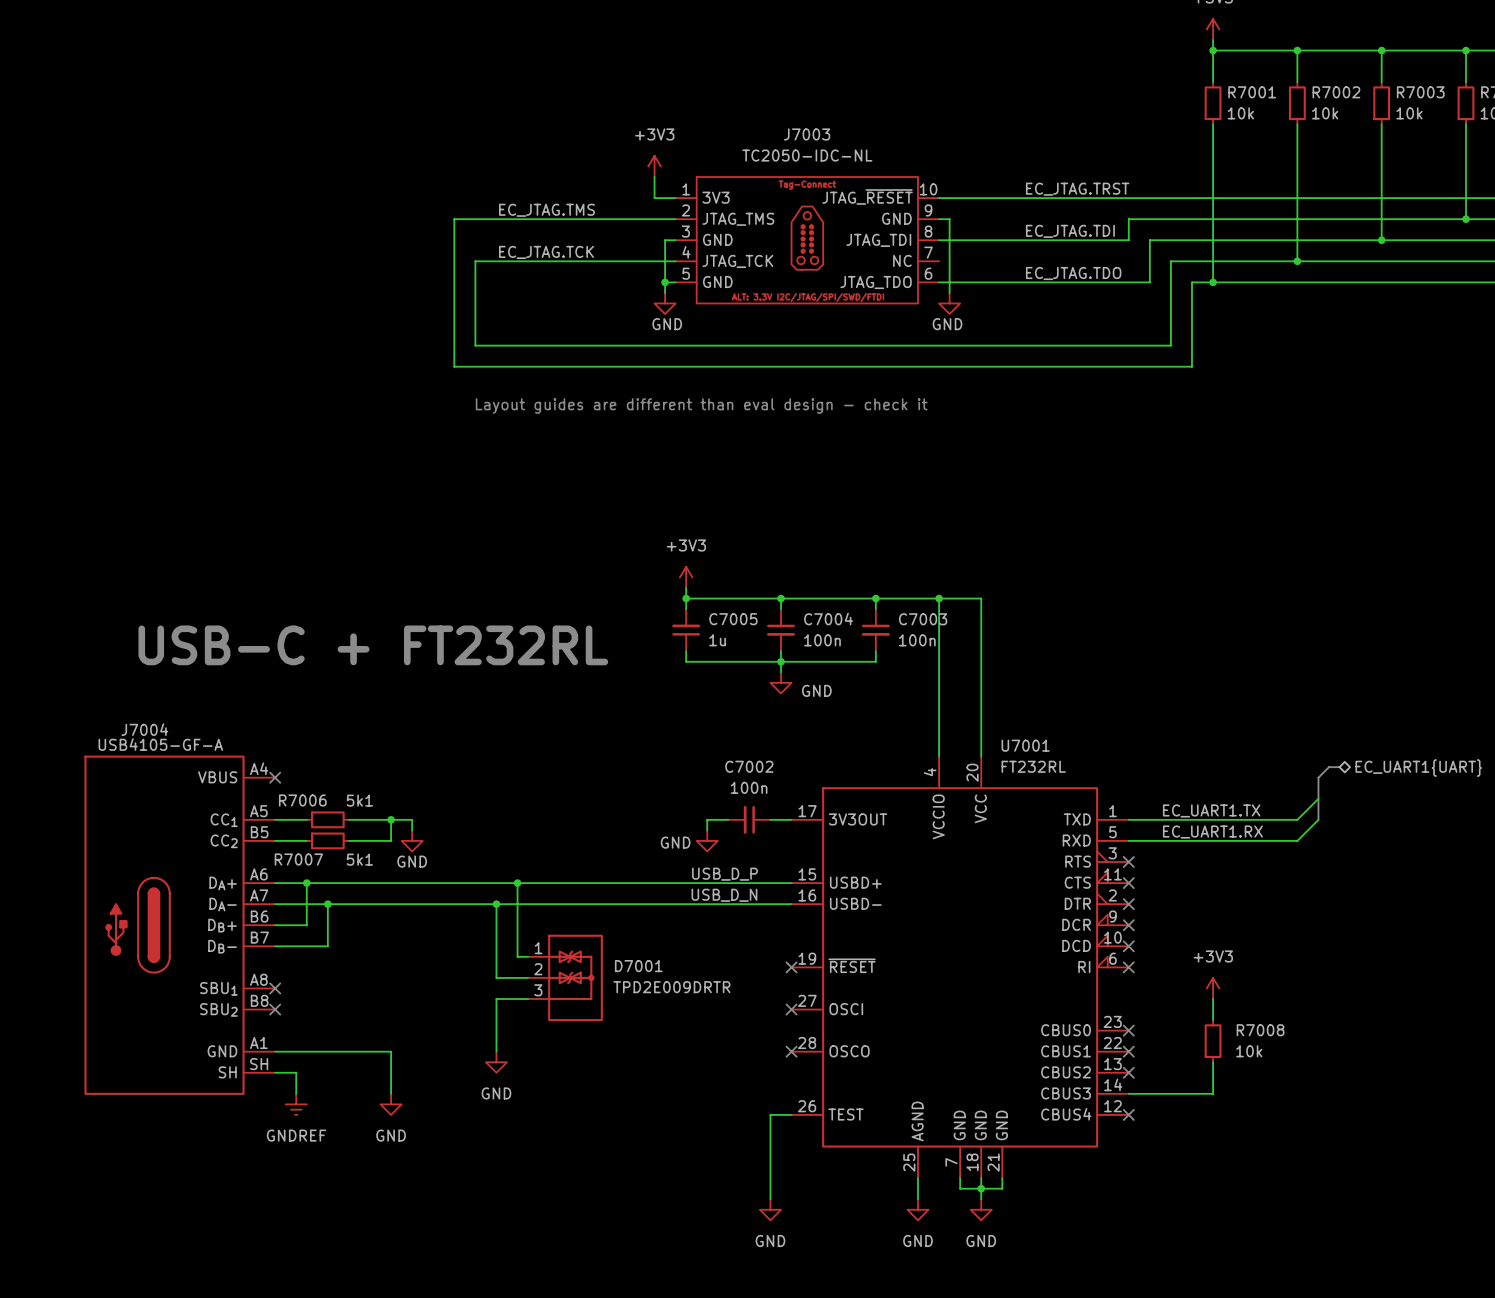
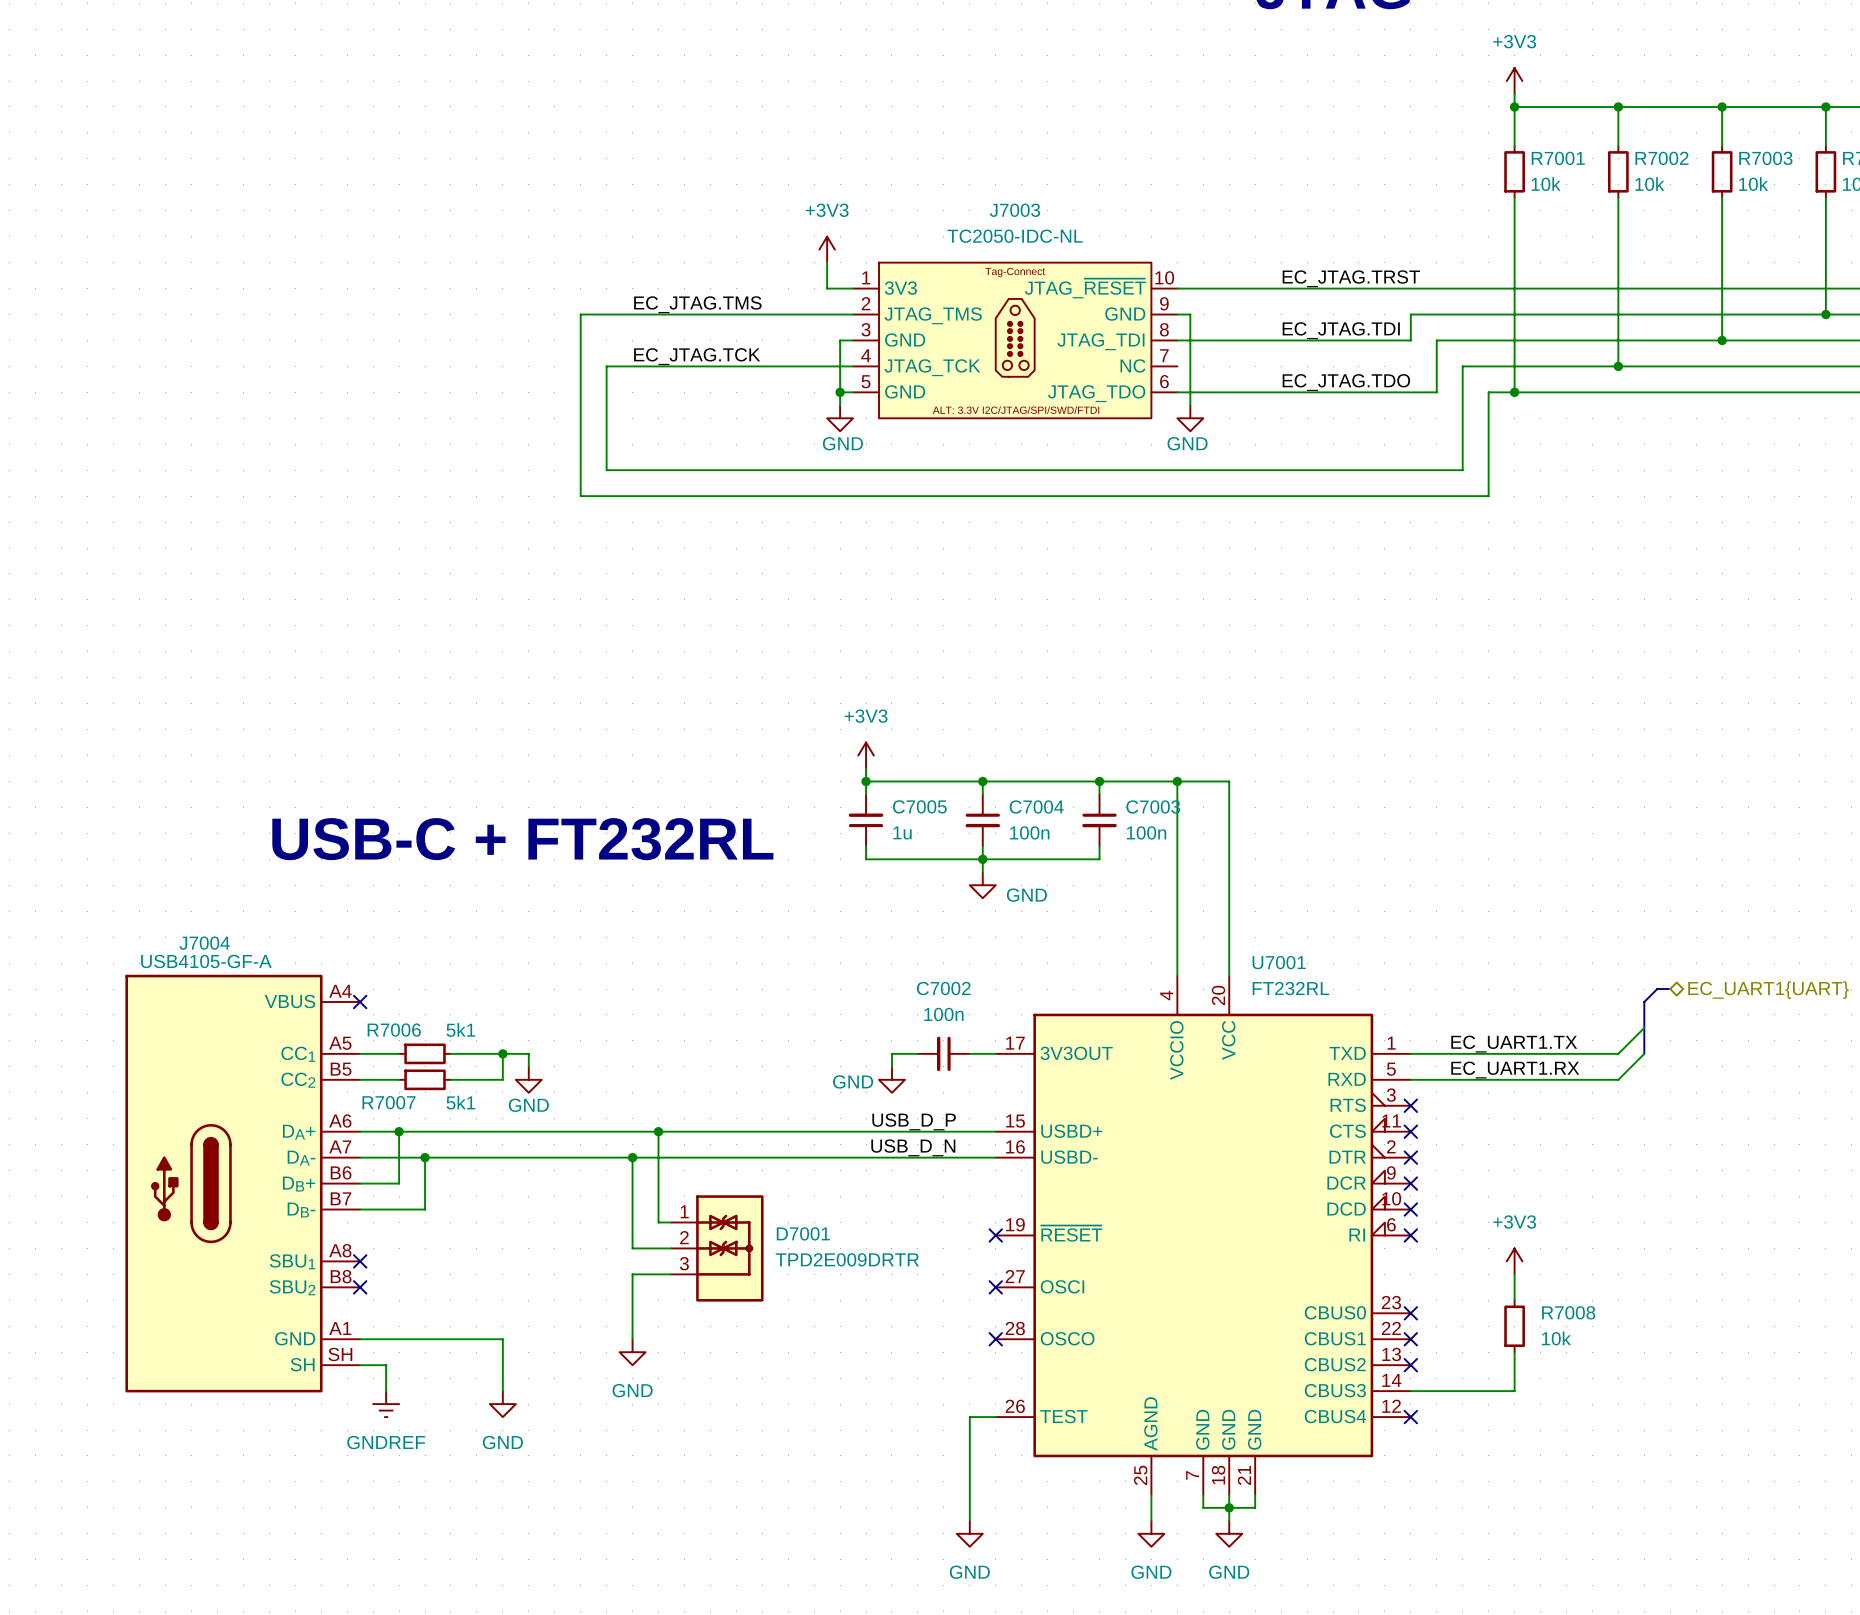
text: Layout guides are different than eval design - check it (701, 406) -> none

